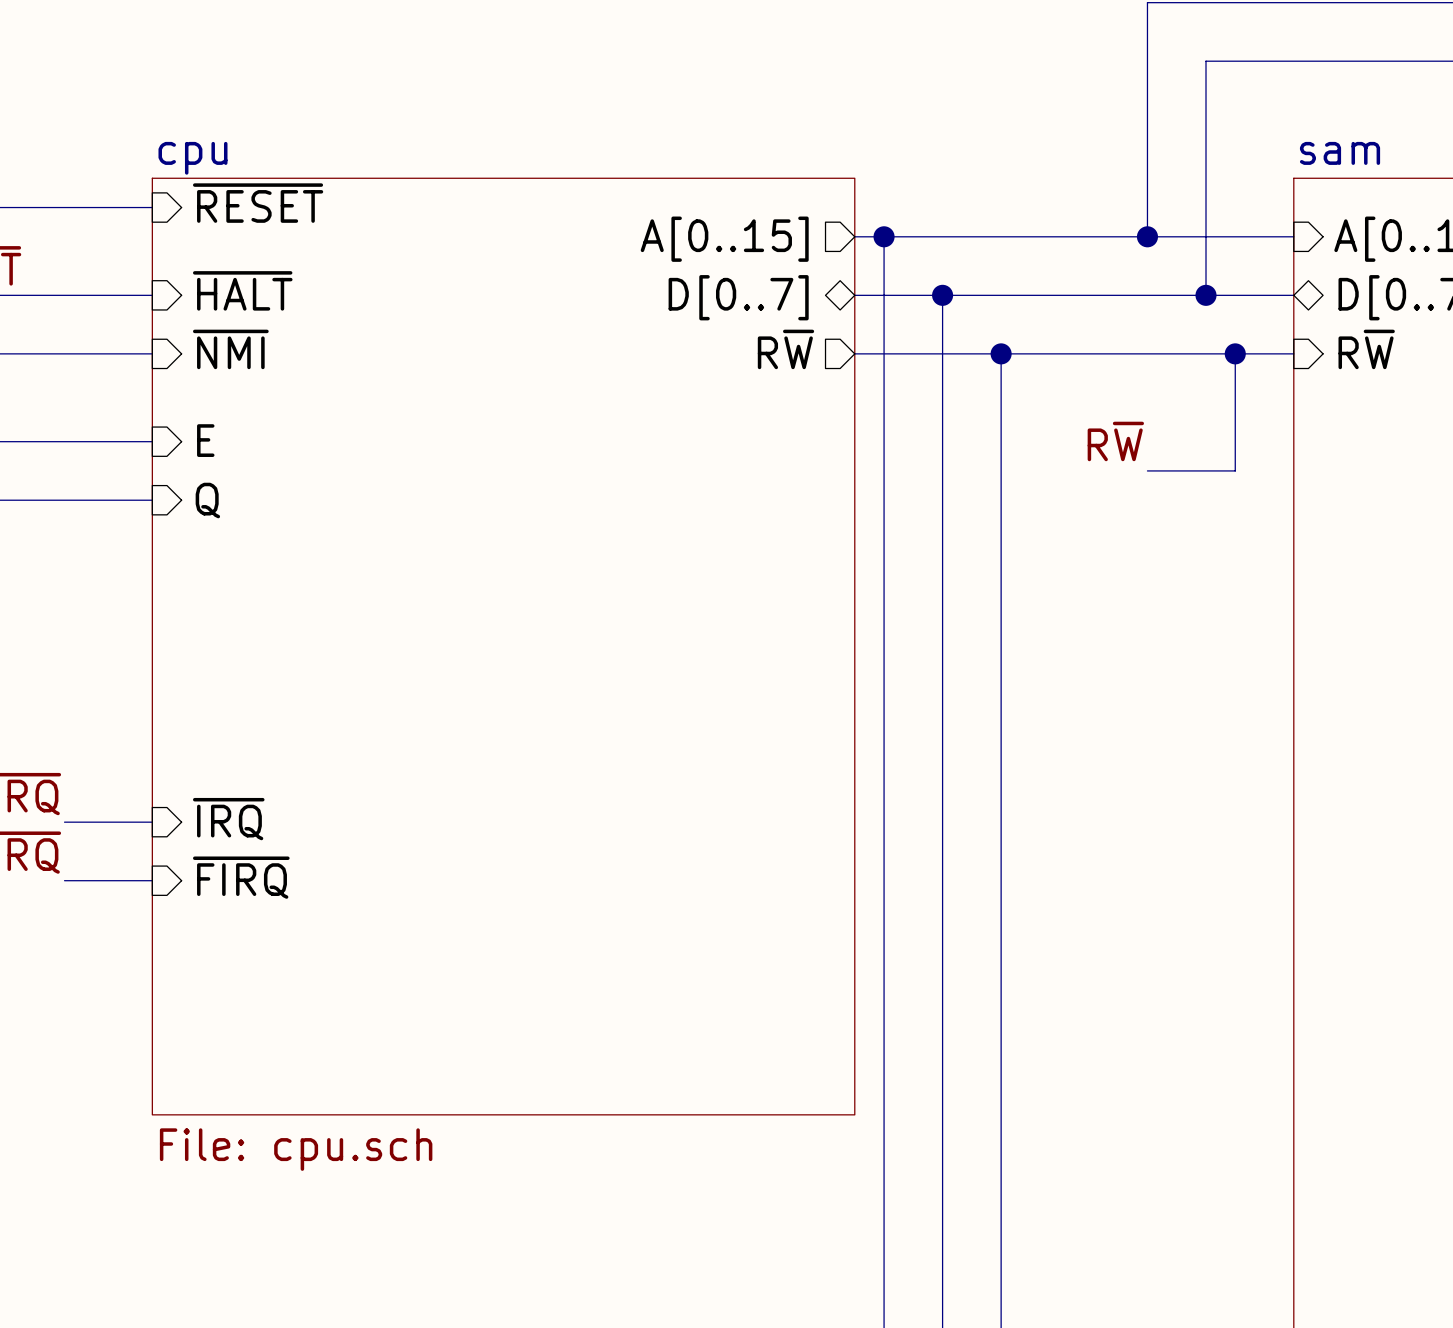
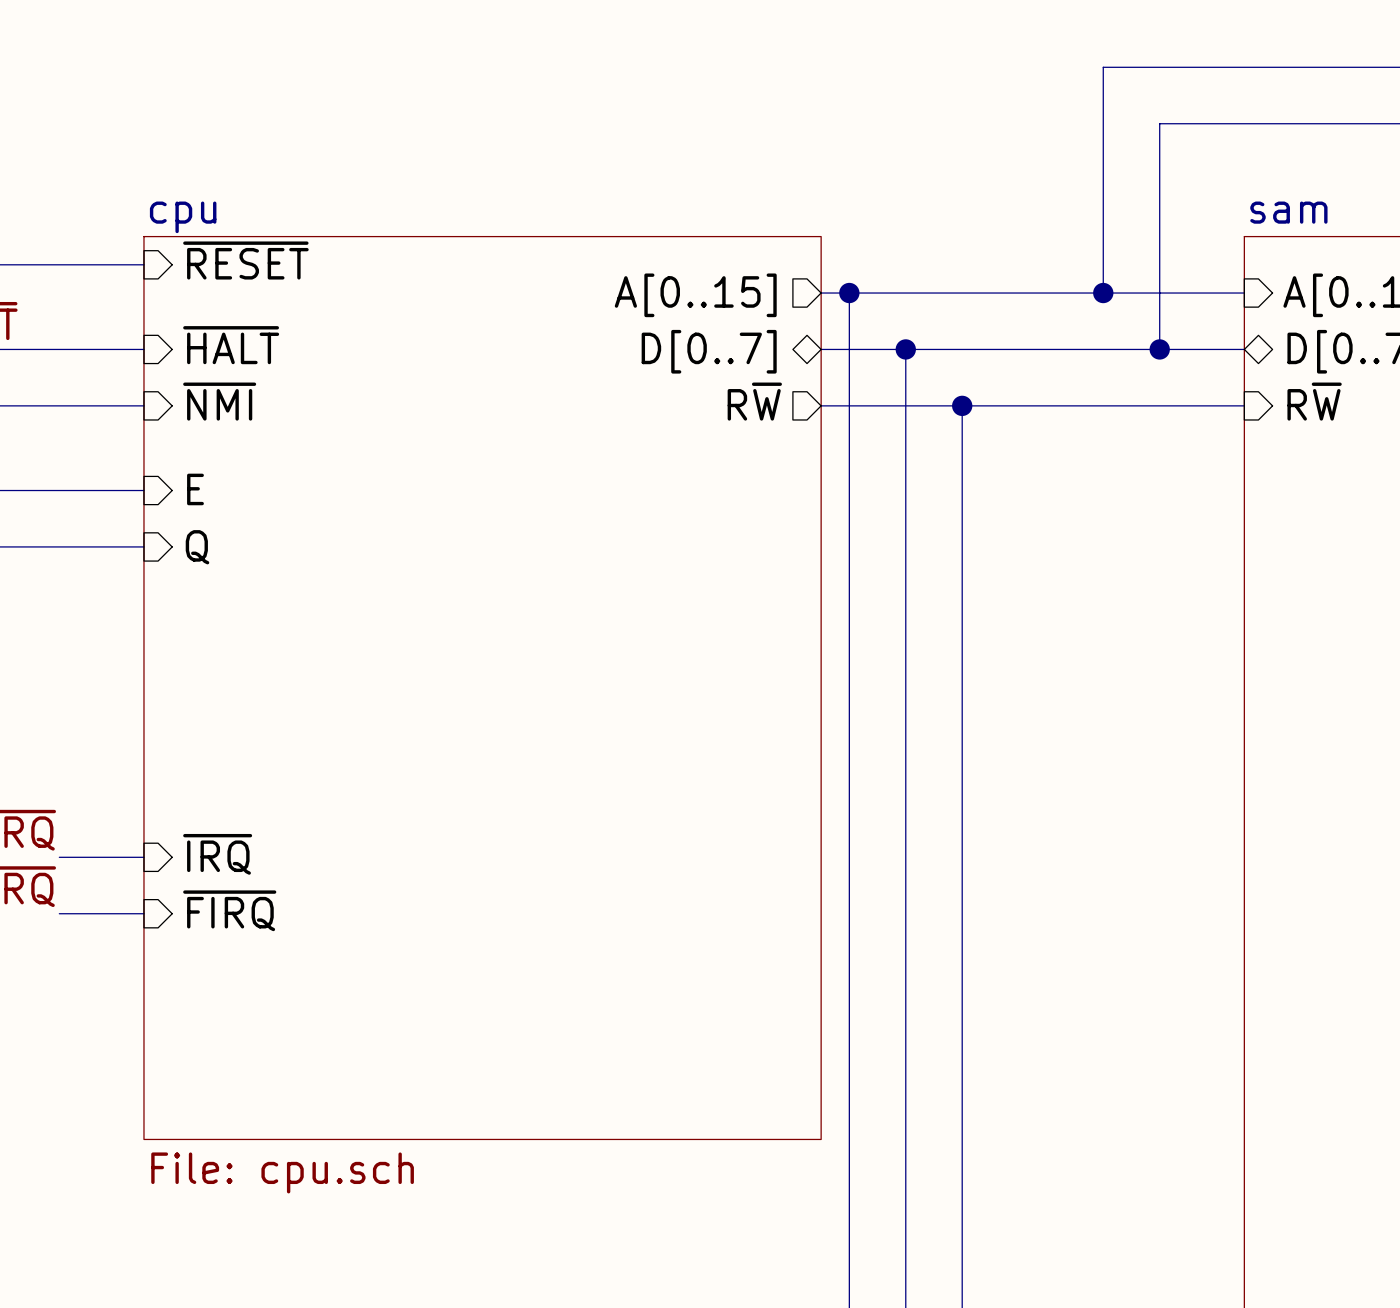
wire: (1235, 353) (1235, 470) (1147, 470) -> none
junction: (1235, 353) -> none
label: R~{W} (1115, 441) -> none

